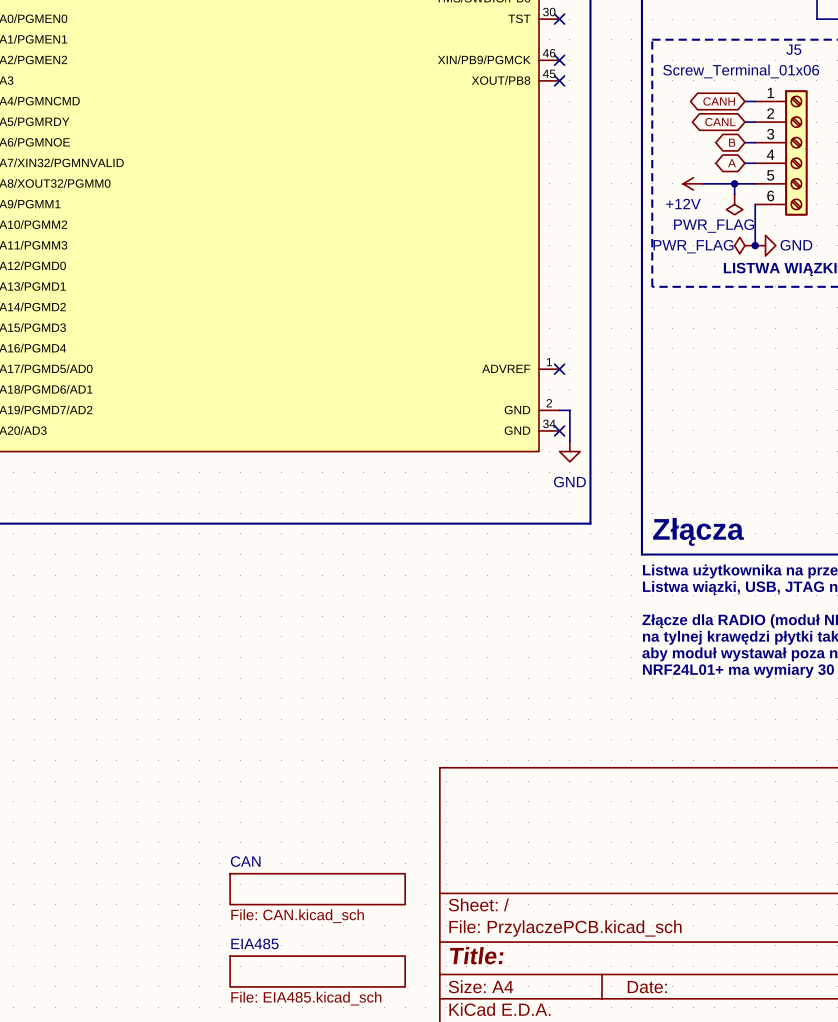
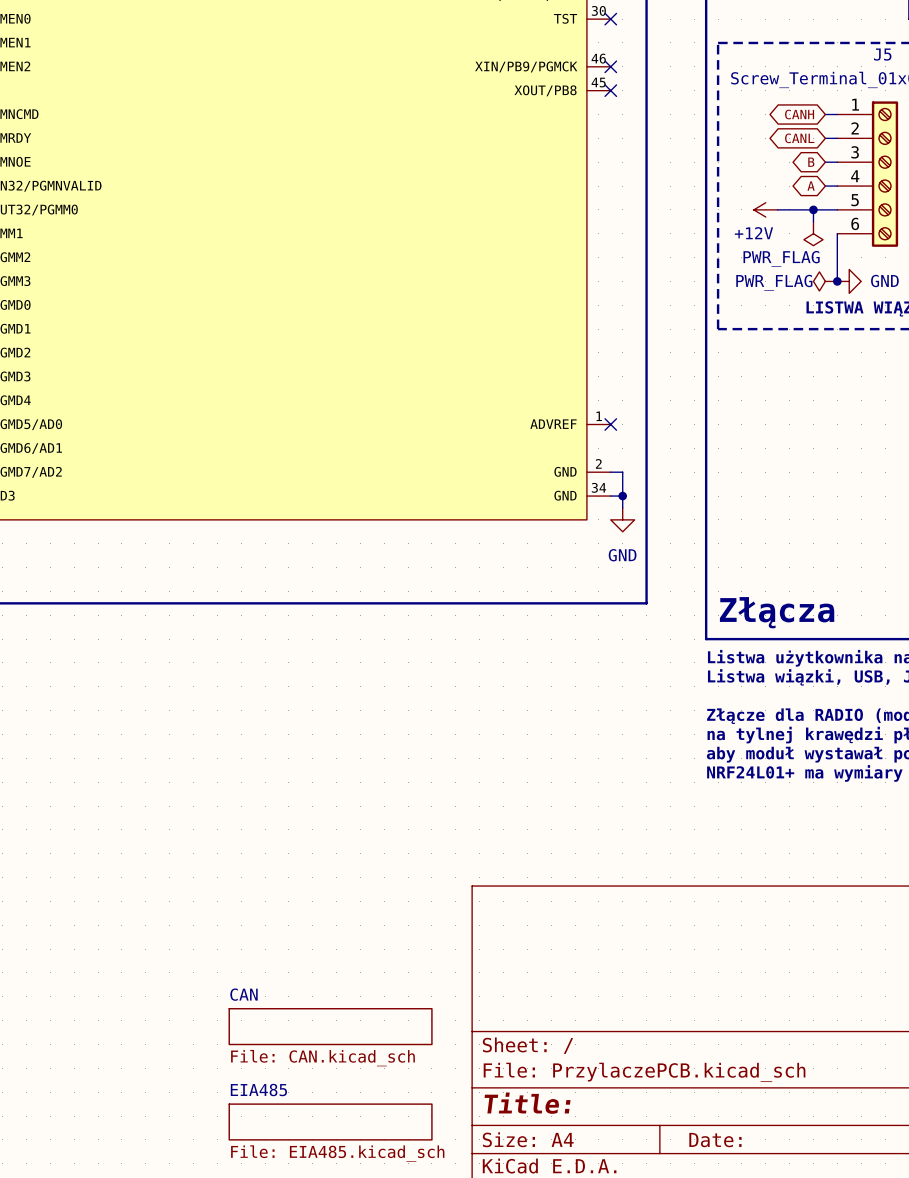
wire: none -> (610, 496) (622, 496)
no-connect mark: (559, 430) -> none
junction: none -> (622, 496)

